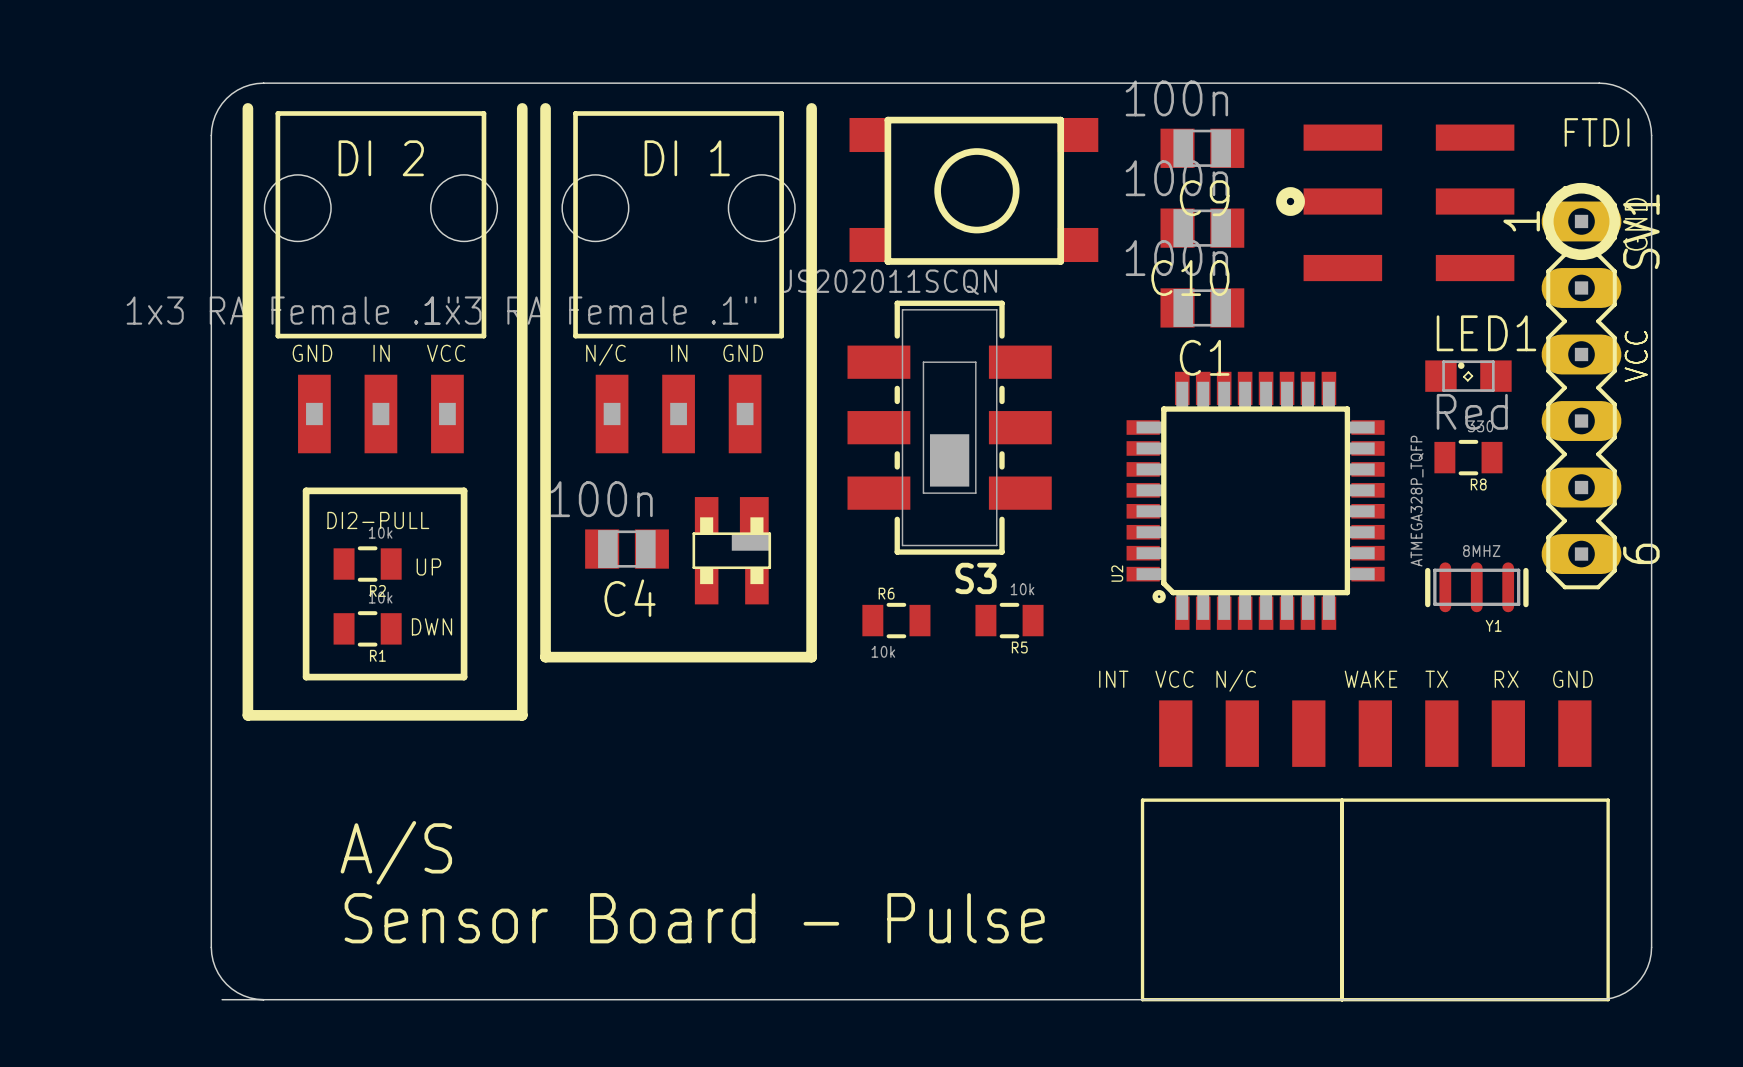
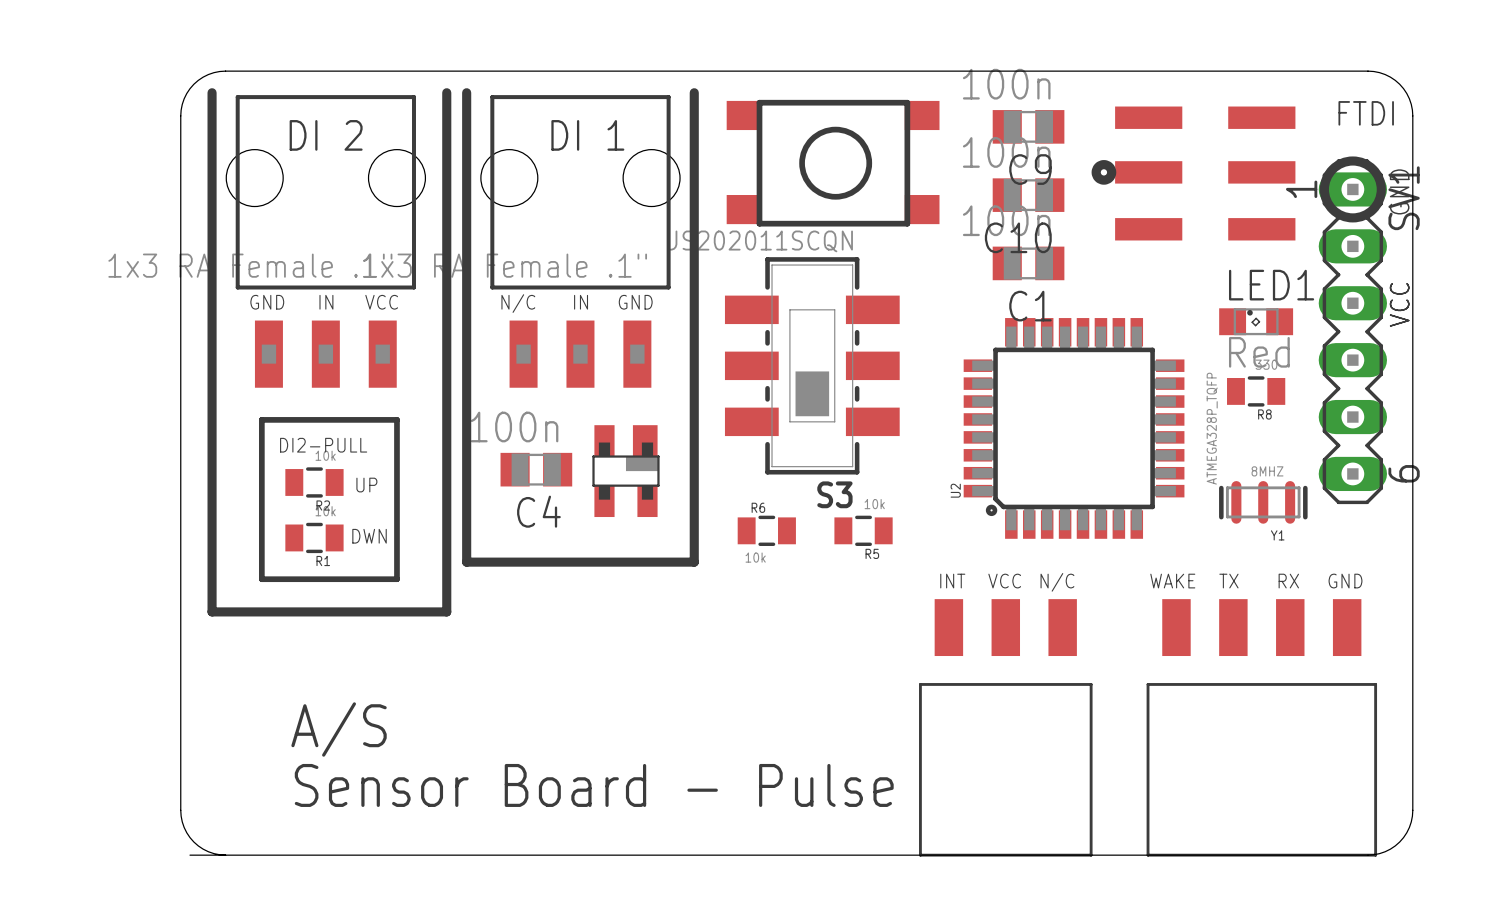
part position: (1242, 850) -> (1005, 727)

